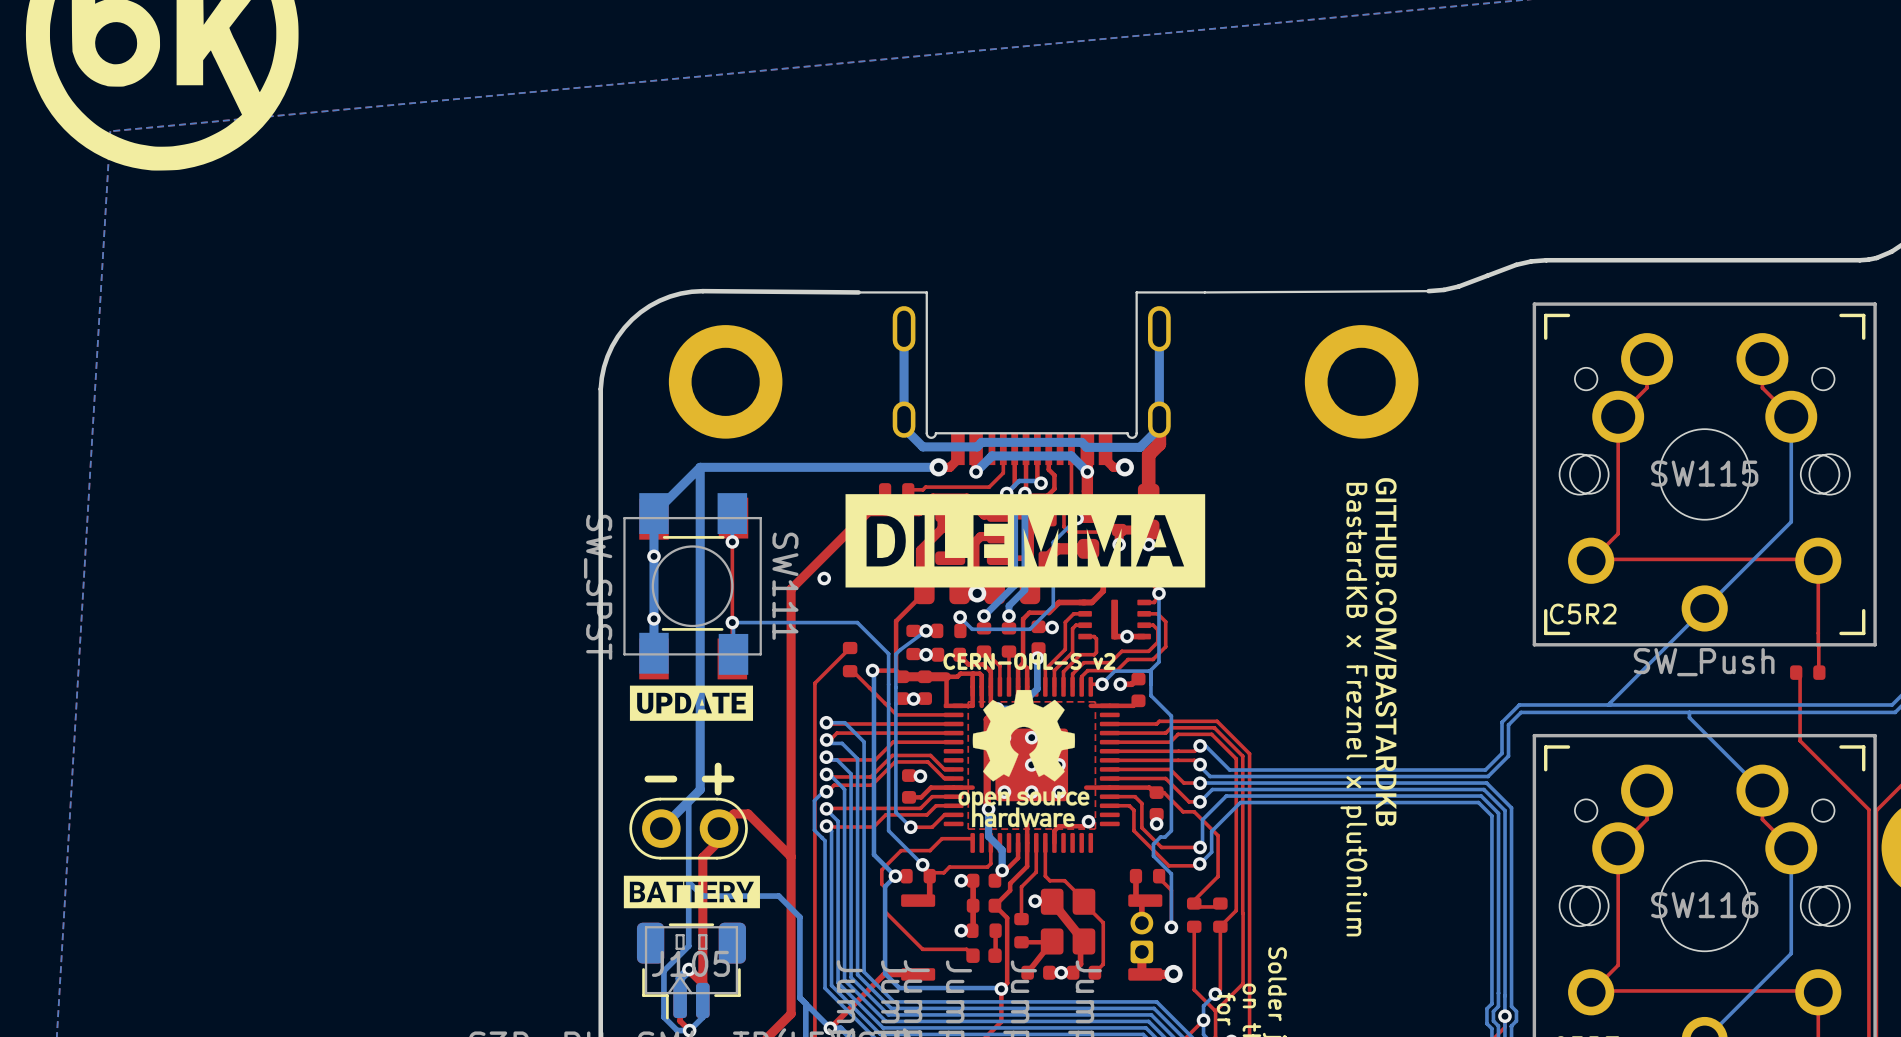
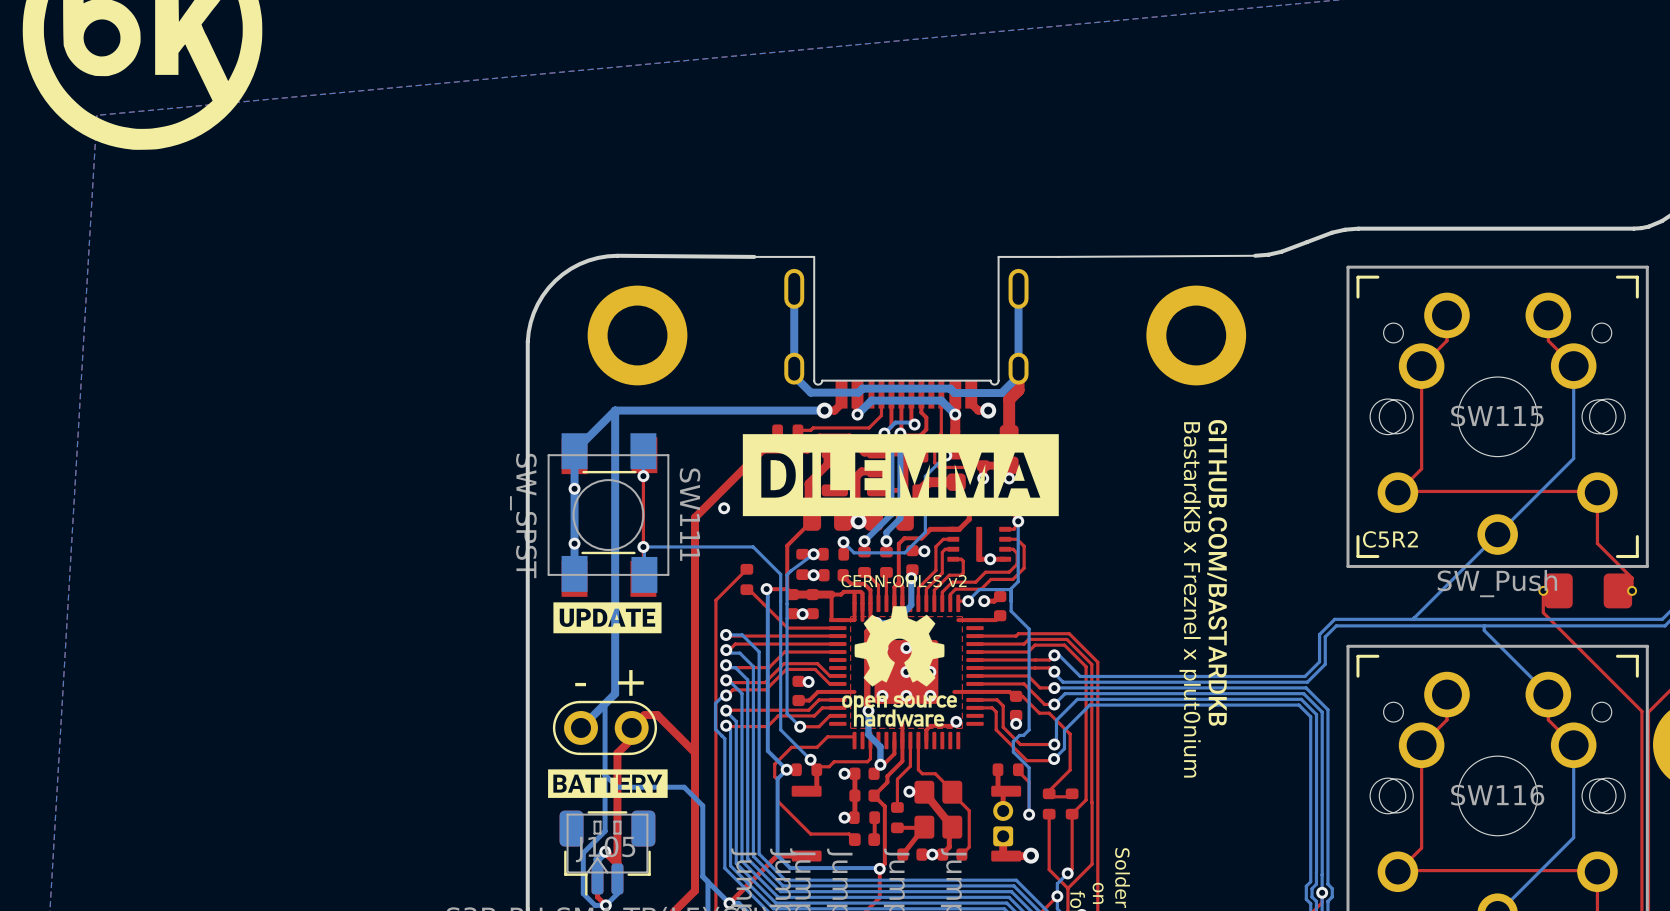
top track: (1818, 618) (1818, 672) -> (1597, 543) (1632, 578) (1632, 590)
part footprint: [1790, 665, 1826, 680] -> [1538, 573, 1638, 609]
top track: (1796, 672) (1800, 675) (1800, 740) -> (1543, 590) (1543, 612) (1581, 650)

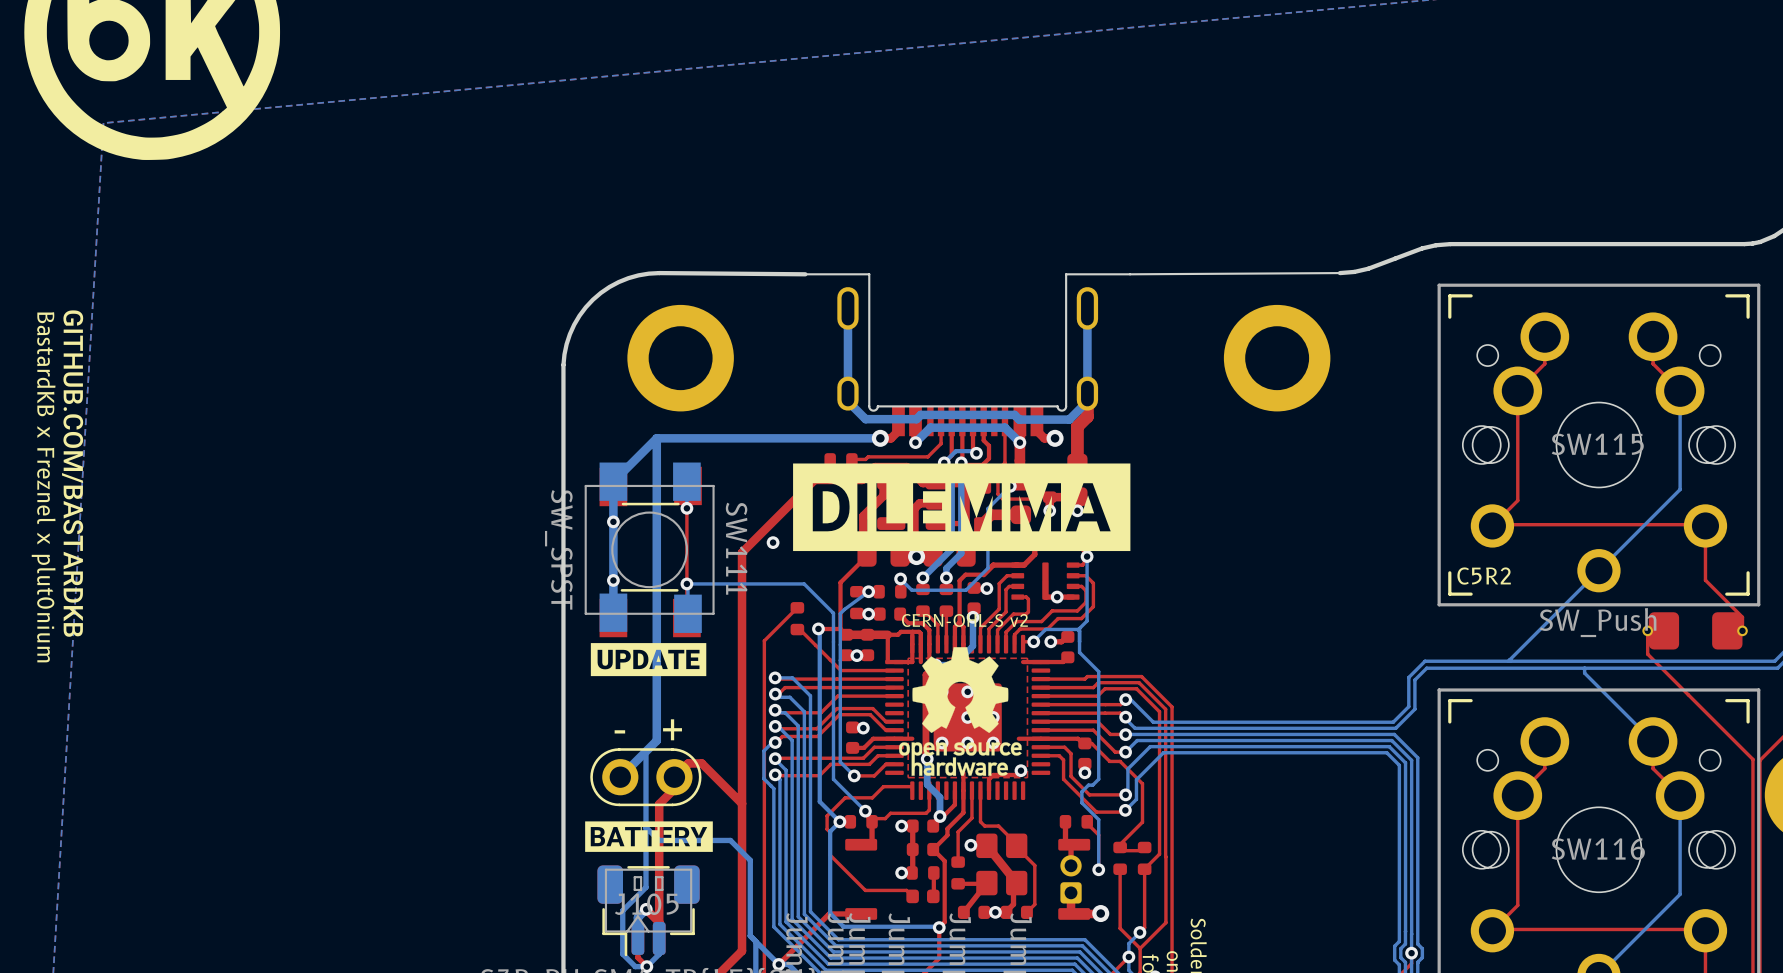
drawing: none -> [62, 310, 84, 637]
drawing: [1207, 420, 1228, 726] -> none
text: none -> BastardKB x Freznel x plut0nium (43, 487)
text: BastardKB x Freznel x plut0nium (1190, 599) -> none

